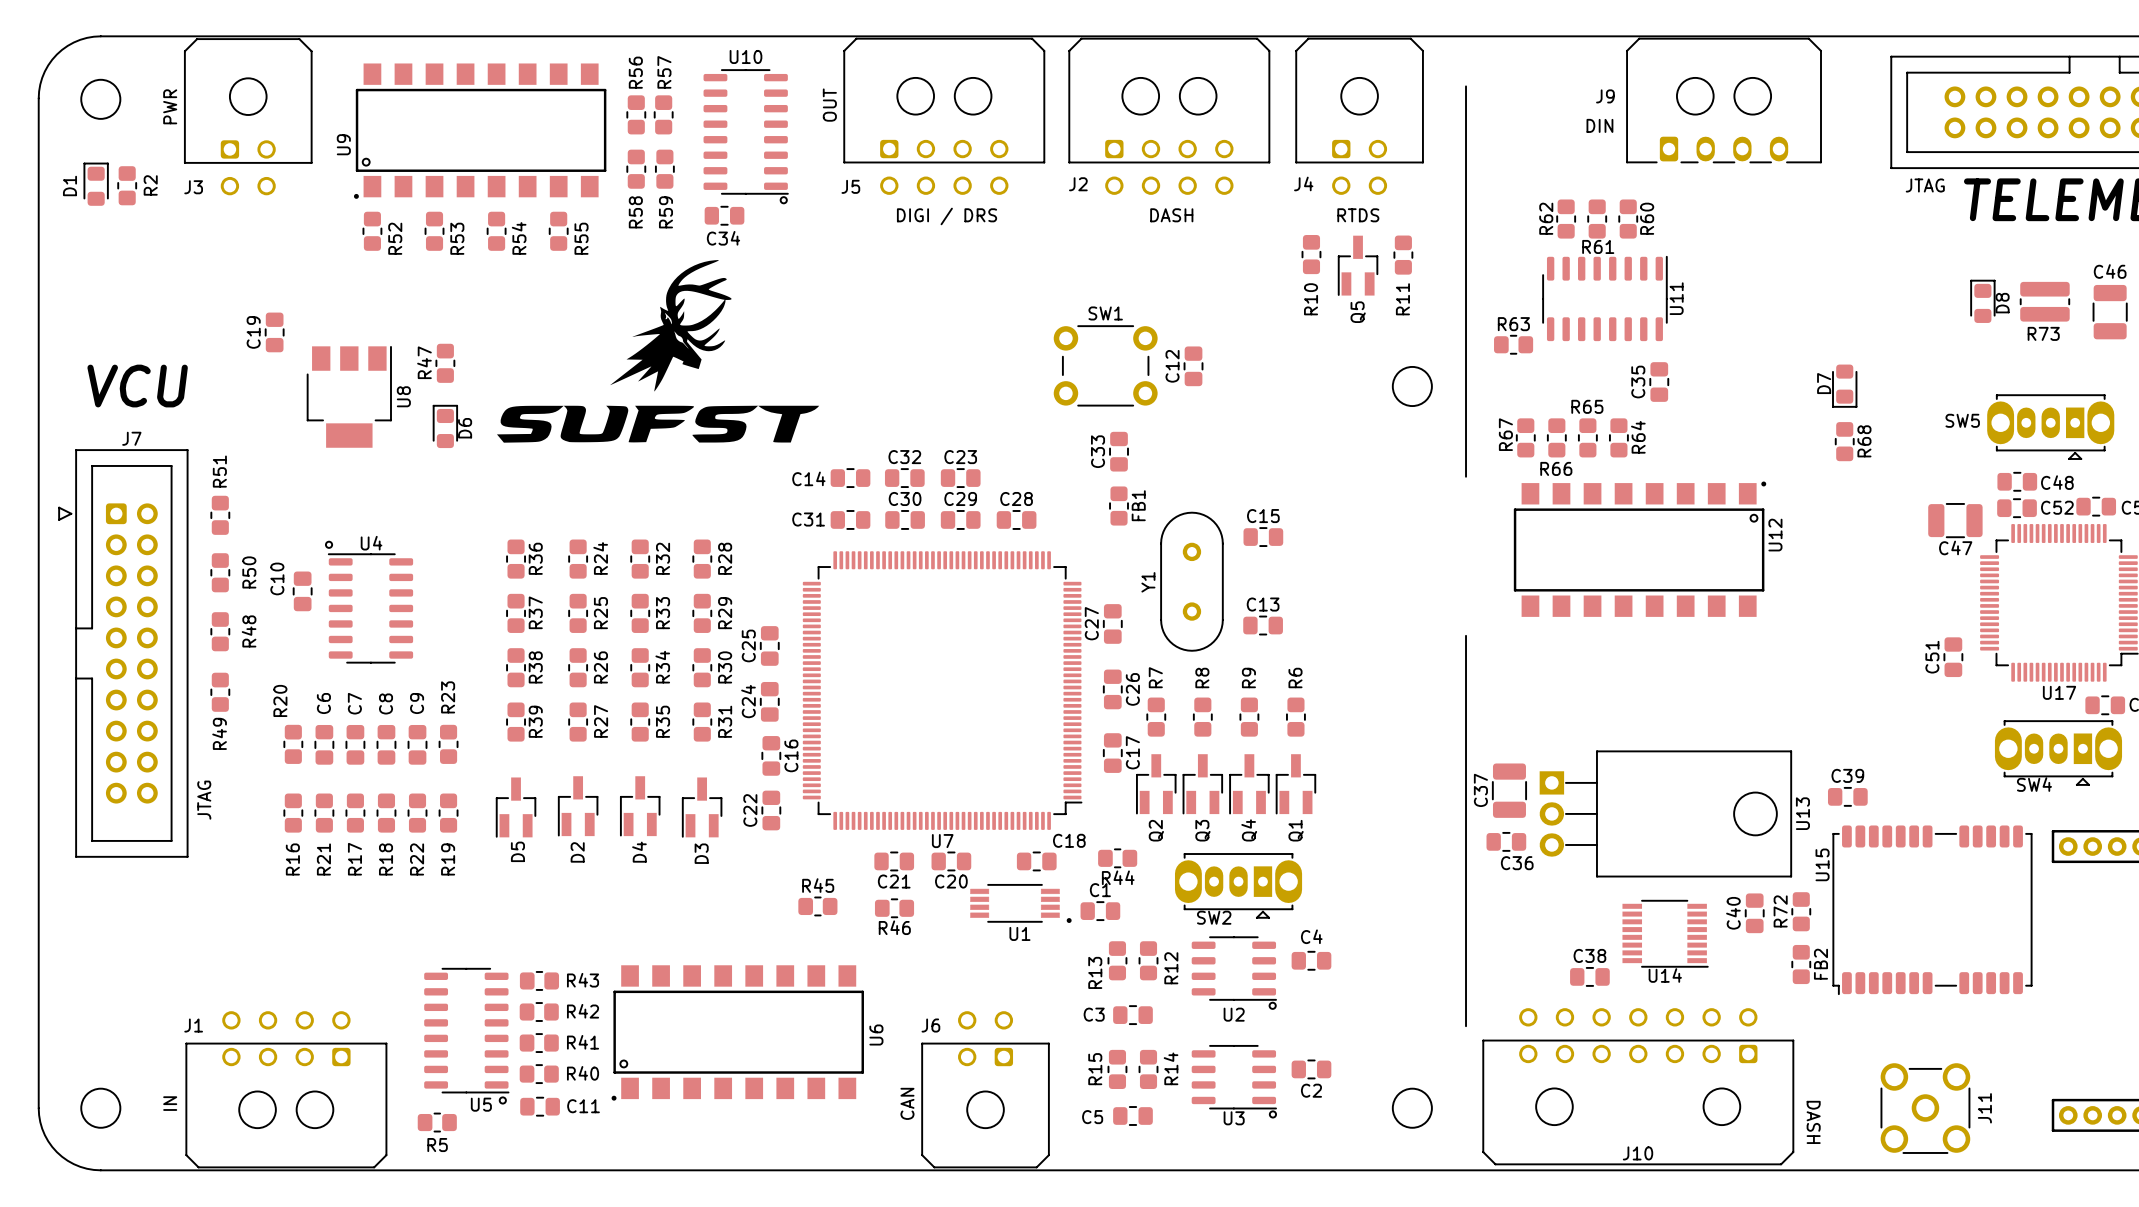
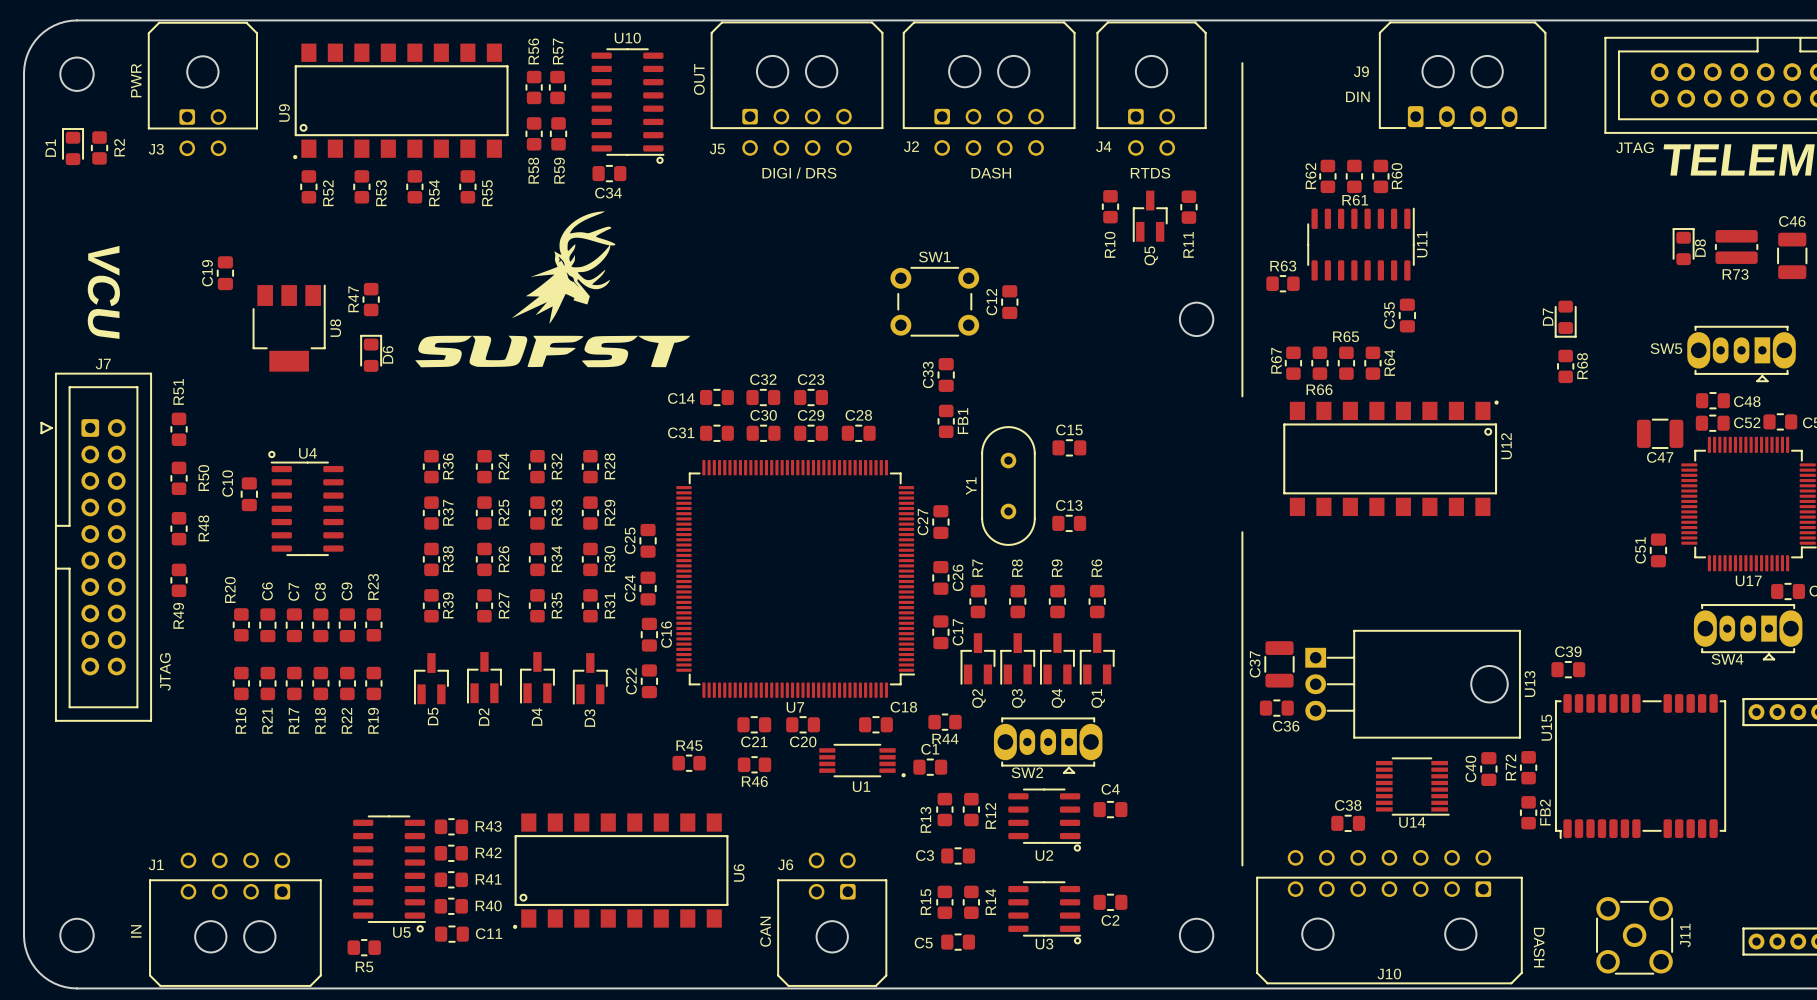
text rotation: 0° (137, 386) -> 90° clockwise (103, 292)

